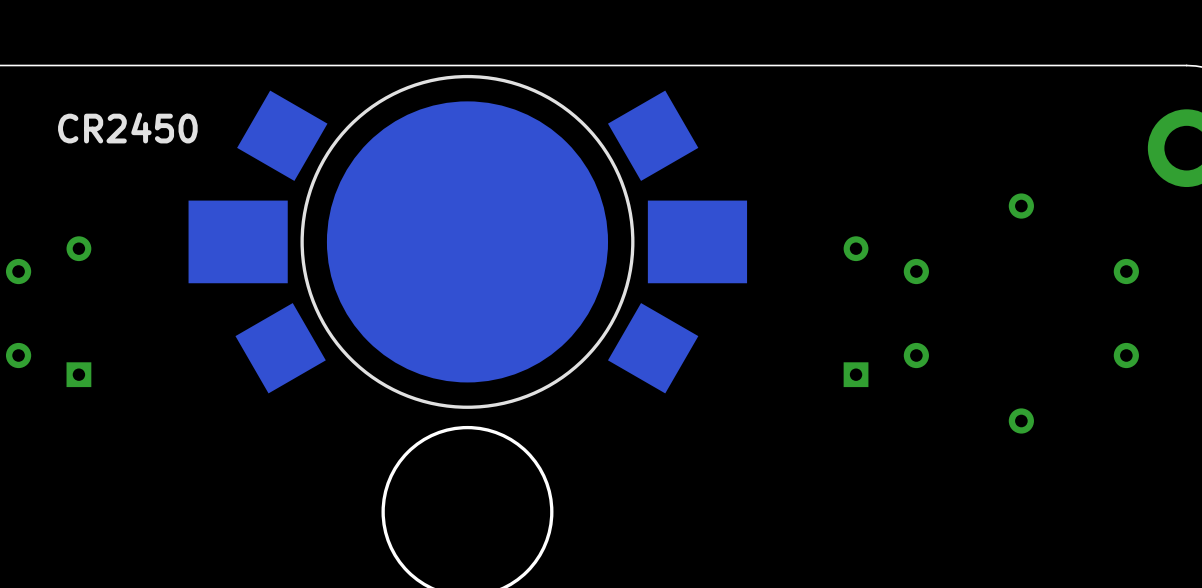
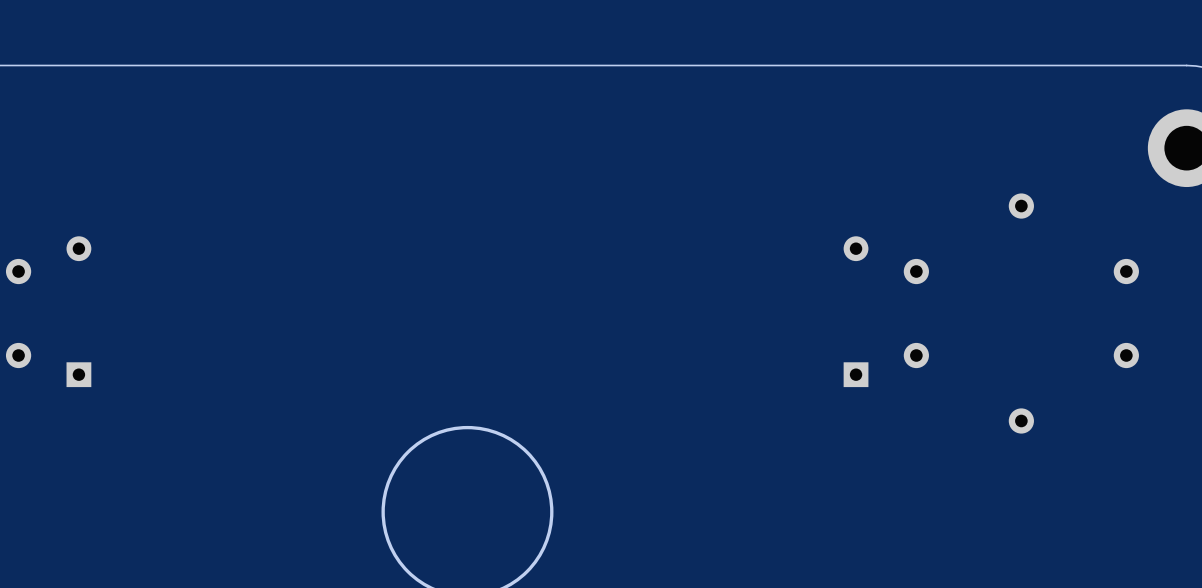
drawing: [300, 74, 635, 409] -> none
text: CR2450 (127, 127) -> none
part: (282, 135) -> none
part: (653, 135) -> none
part: (238, 241) -> none
part: (467, 241) -> none
part: (697, 241) -> none
part: (280, 348) -> none
part: (653, 348) -> none

